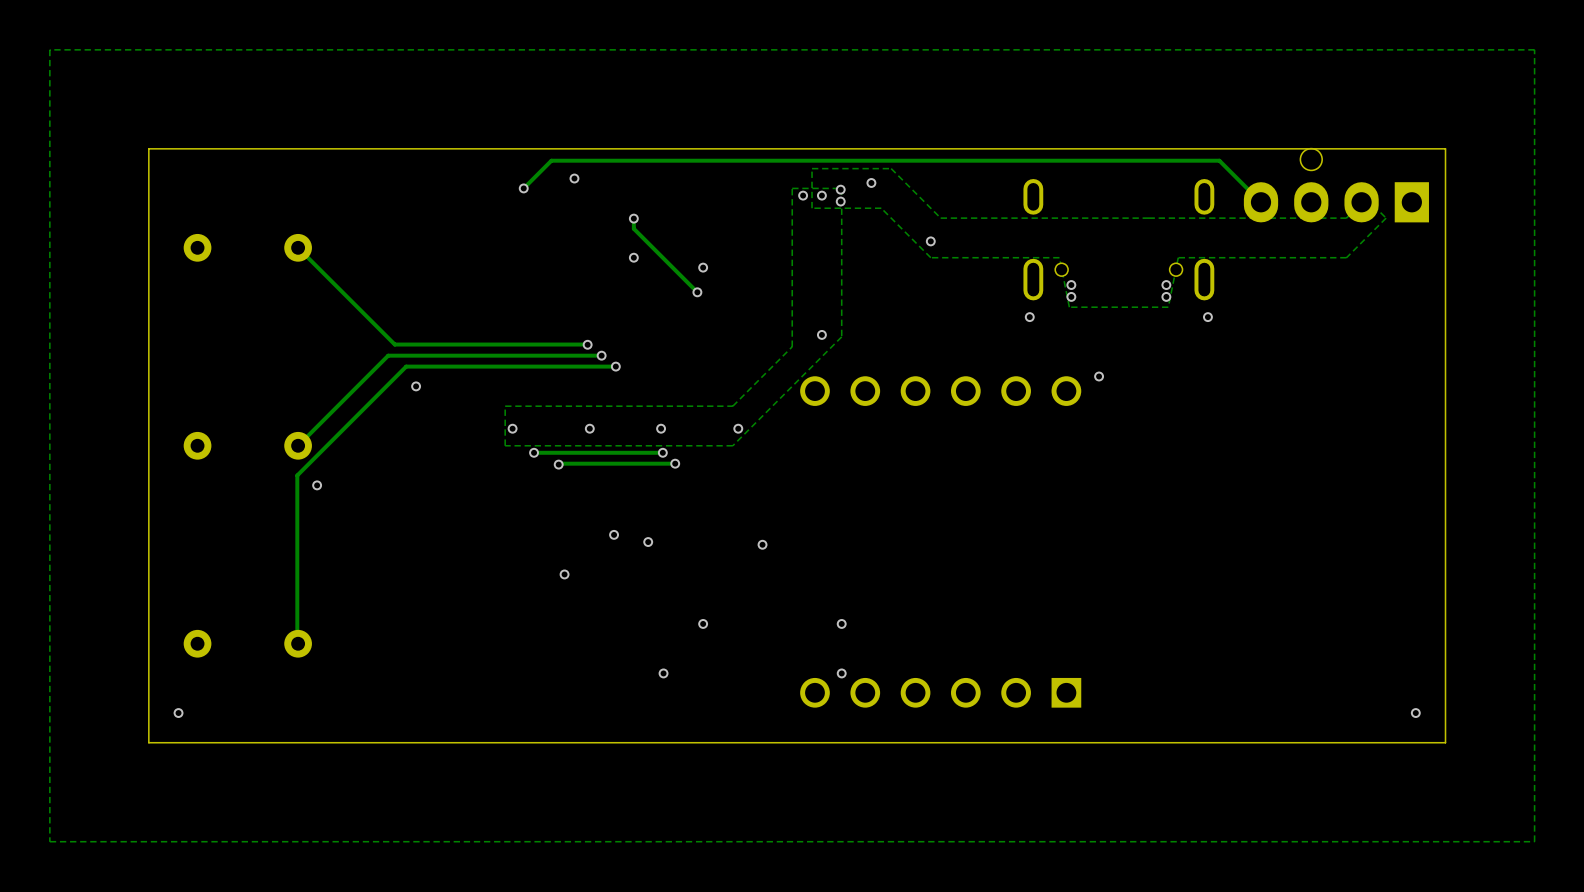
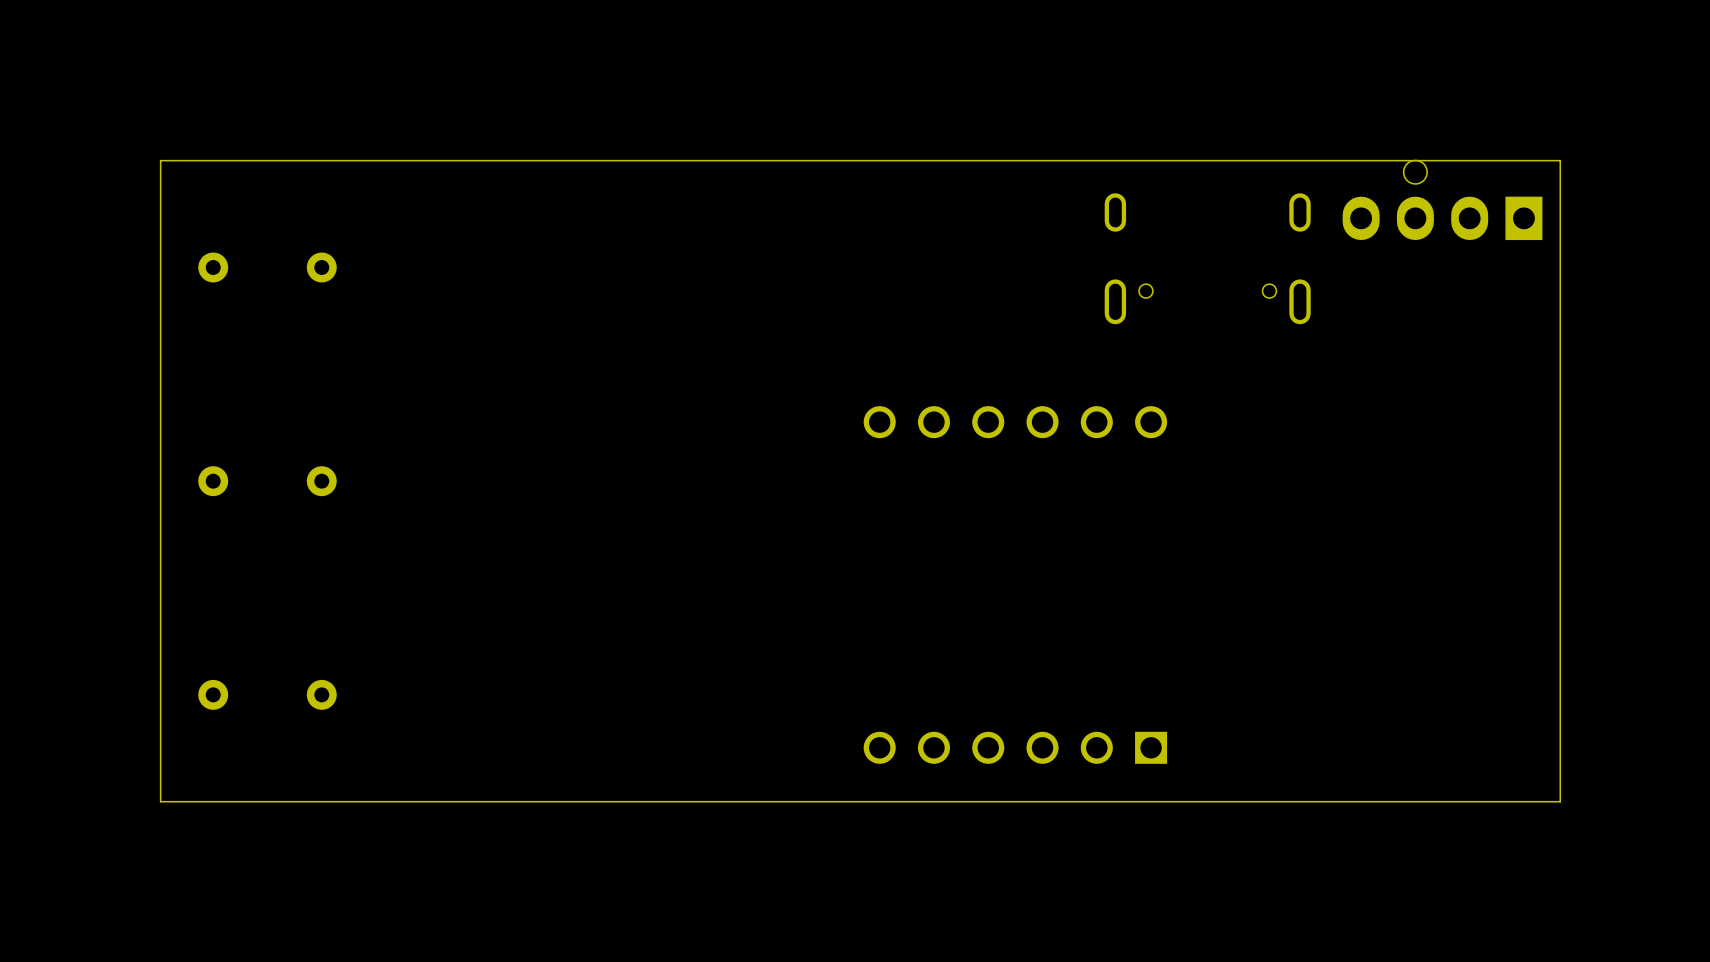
zone outline: (1534, 49) (1534, 841) (49, 841) (49, 49) (1534, 49) -> none
zone outline: (891, 168) (812, 168) (812, 208) (881, 208) (930, 257) (1059, 257) (1069, 307) (1168, 307) (1178, 257) (1346, 257) (1386, 218) (1366, 198) (1346, 218) (940, 218) (891, 168) -> none
via: (574, 178) -> none
via: (871, 182) -> none
track: (523, 188) (551, 160) (1219, 160) (1261, 202) -> none
via: (523, 188) -> none
zone outline: (841, 188) (792, 188) (792, 346) (732, 406) (505, 406) (505, 445) (732, 445) (841, 336) (841, 188) -> none
via: (840, 189) -> none
via: (803, 195) -> none
via: (821, 195) -> none
via: (840, 201) -> none
track: (633, 218) (633, 228) (697, 292) -> none
via: (633, 218) -> none
via: (930, 241) -> none
track: (298, 247) (394, 344) (587, 344) -> none
via: (633, 257) -> none
via: (703, 267) -> none
via: (1071, 285) -> none
via: (1166, 285) -> none
via: (697, 292) -> none
via: (1071, 296) -> none
via: (1166, 296) -> none
via: (1029, 317) -> none
via: (1207, 317) -> none
via: (821, 334) -> none
via: (587, 344) -> none
track: (601, 355) (388, 355) (298, 445) -> none
via: (601, 355) -> none
track: (615, 366) (406, 366) (297, 475) (298, 643) -> none
via: (615, 366) -> none
via: (1099, 376) -> none
via: (416, 386) -> none
via: (512, 428) -> none
via: (589, 428) -> none
via: (661, 428) -> none
via: (738, 428) -> none
via: (534, 452) -> none
track: (662, 452) (534, 452) -> none
via: (662, 452) -> none
track: (675, 463) (558, 464) -> none
via: (675, 463) -> none
via: (558, 464) -> none
via: (317, 485) -> none
via: (614, 534) -> none
via: (648, 542) -> none
via: (762, 544) -> none
via: (564, 574) -> none
via: (703, 623) -> none
via: (841, 623) -> none
via: (663, 673) -> none
via: (841, 673) -> none
via: (178, 713) -> none
via: (1415, 713) -> none

